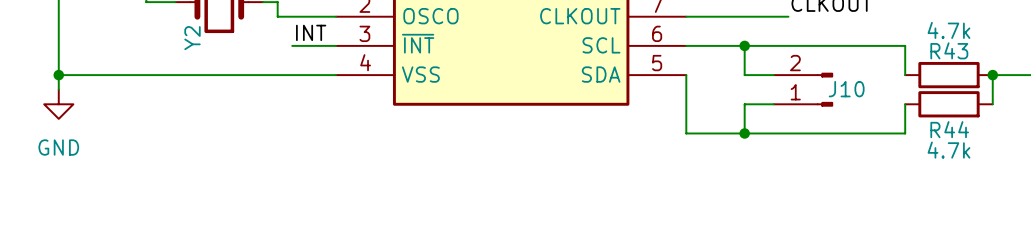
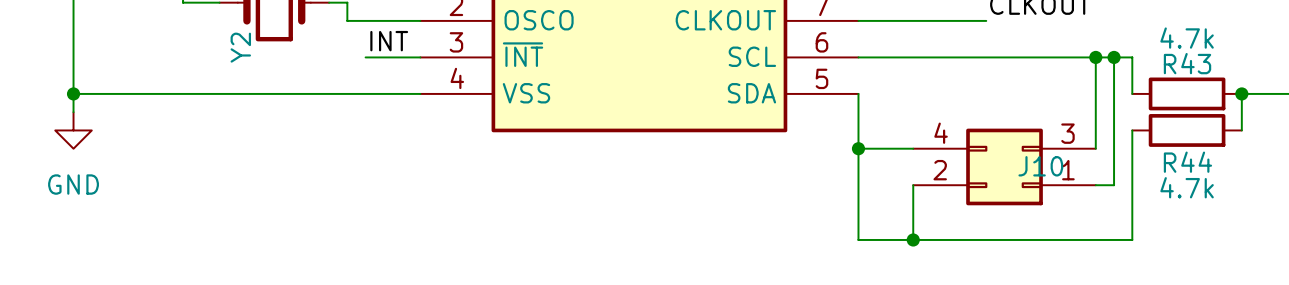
wire: (744, 45) (744, 75) (773, 75) -> none
junction: (744, 45) -> none
wire: none -> (1095, 57) (1095, 148)
junction: none -> (1095, 57)
wire: none -> (1114, 57) (1114, 185) (1095, 185)
junction: none -> (1114, 57)
J10 symbol: [773, 72, 834, 107] -> [913, 128, 1096, 206]
wire: (773, 104) (744, 104) (744, 133) -> none
wire: none -> (858, 148) (913, 148)
junction: none -> (858, 148)
wire: (686, 133) (905, 133) -> (858, 166) (858, 239) (1132, 239) (1132, 166)
junction: (744, 133) -> none
wire: none -> (913, 185) (913, 239)
junction: none -> (913, 239)

